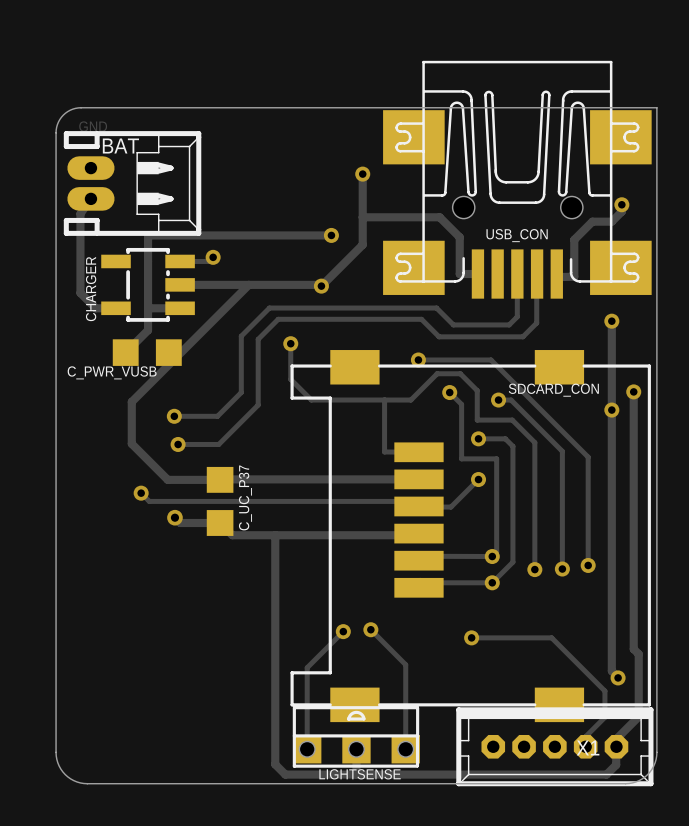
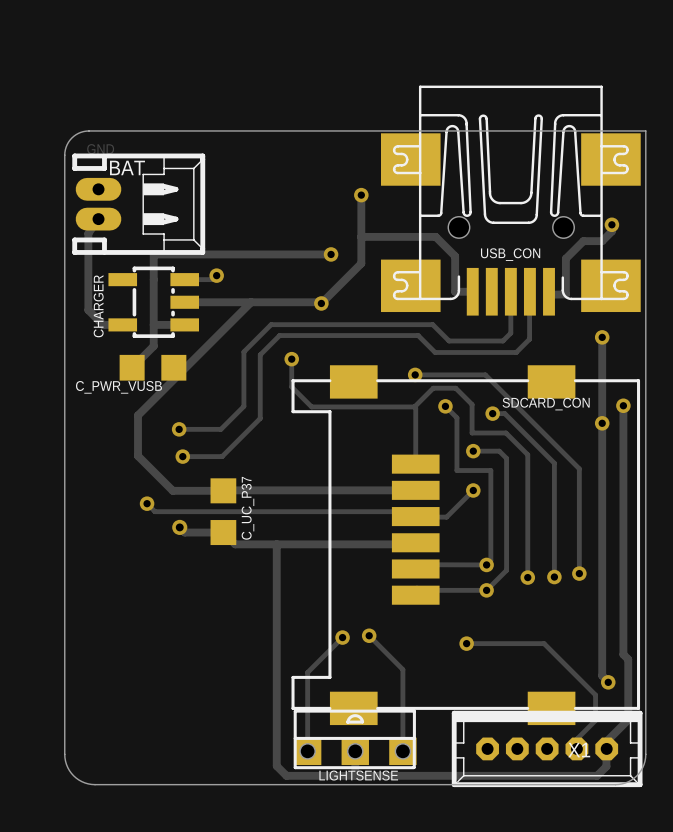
track: (290, 372) (290, 379) (311, 400) (384, 400) -> (291, 387) (311, 406) (414, 406) (415, 464)
track: (417, 393) (410, 400) (384, 400) -> none
track: (384, 400) (384, 451) (418, 452) -> none

